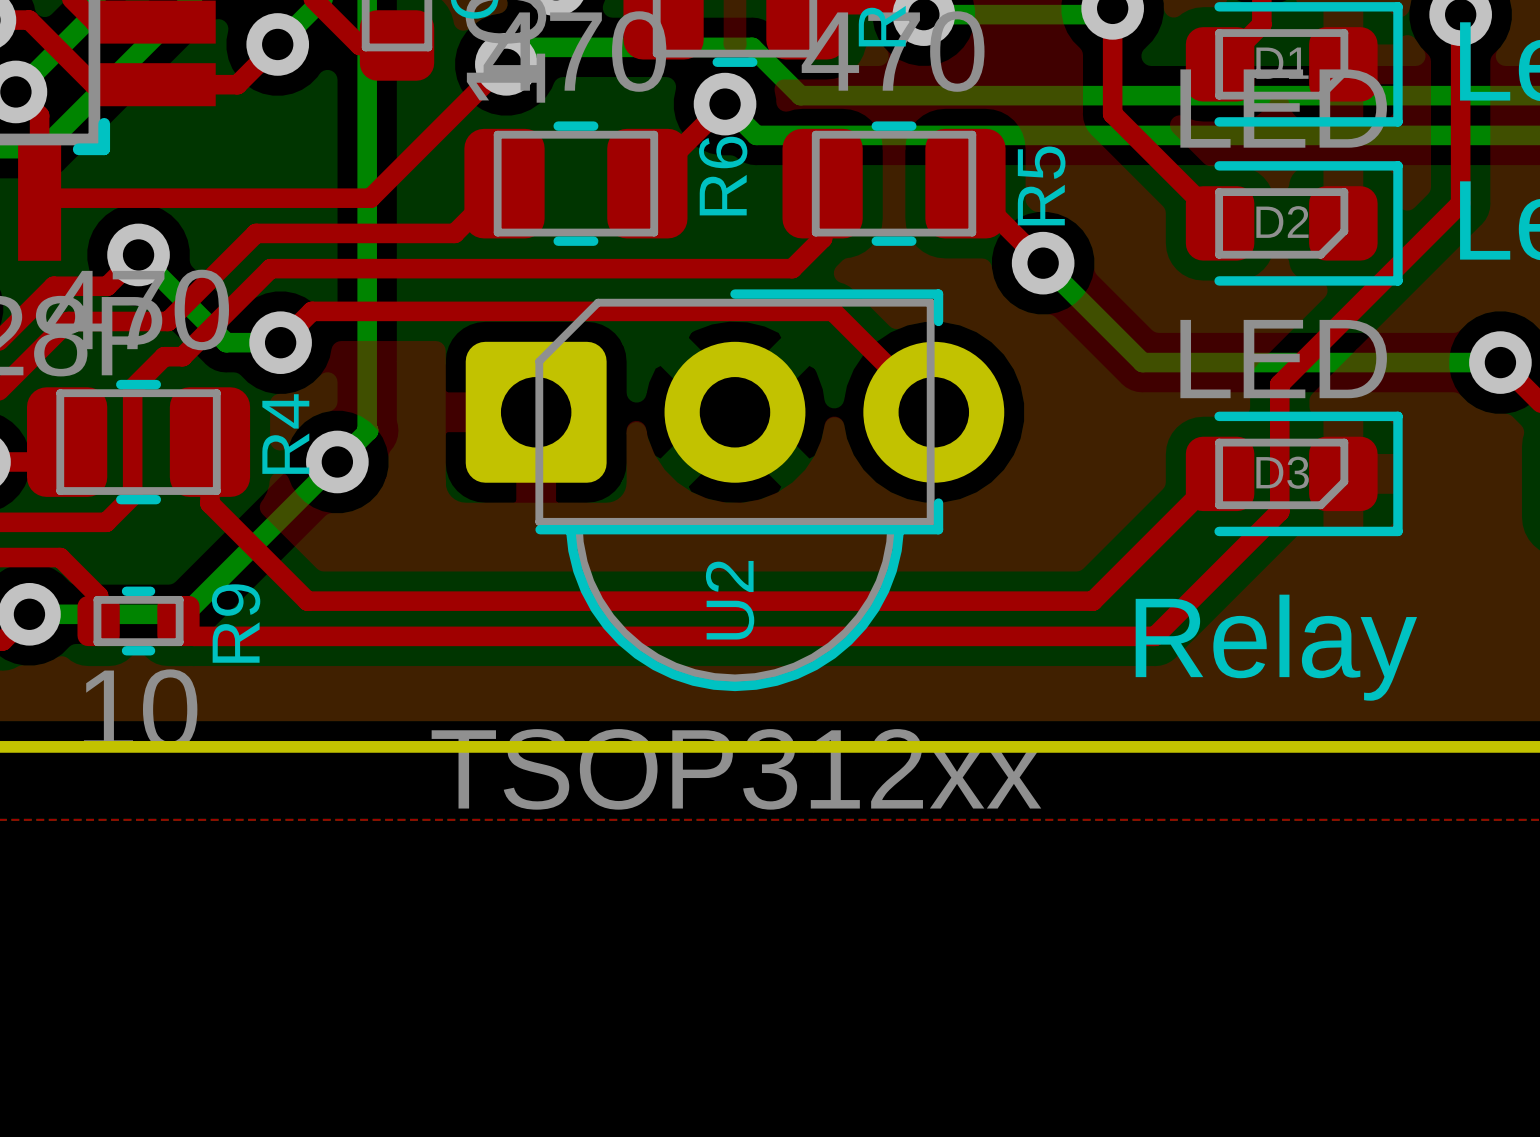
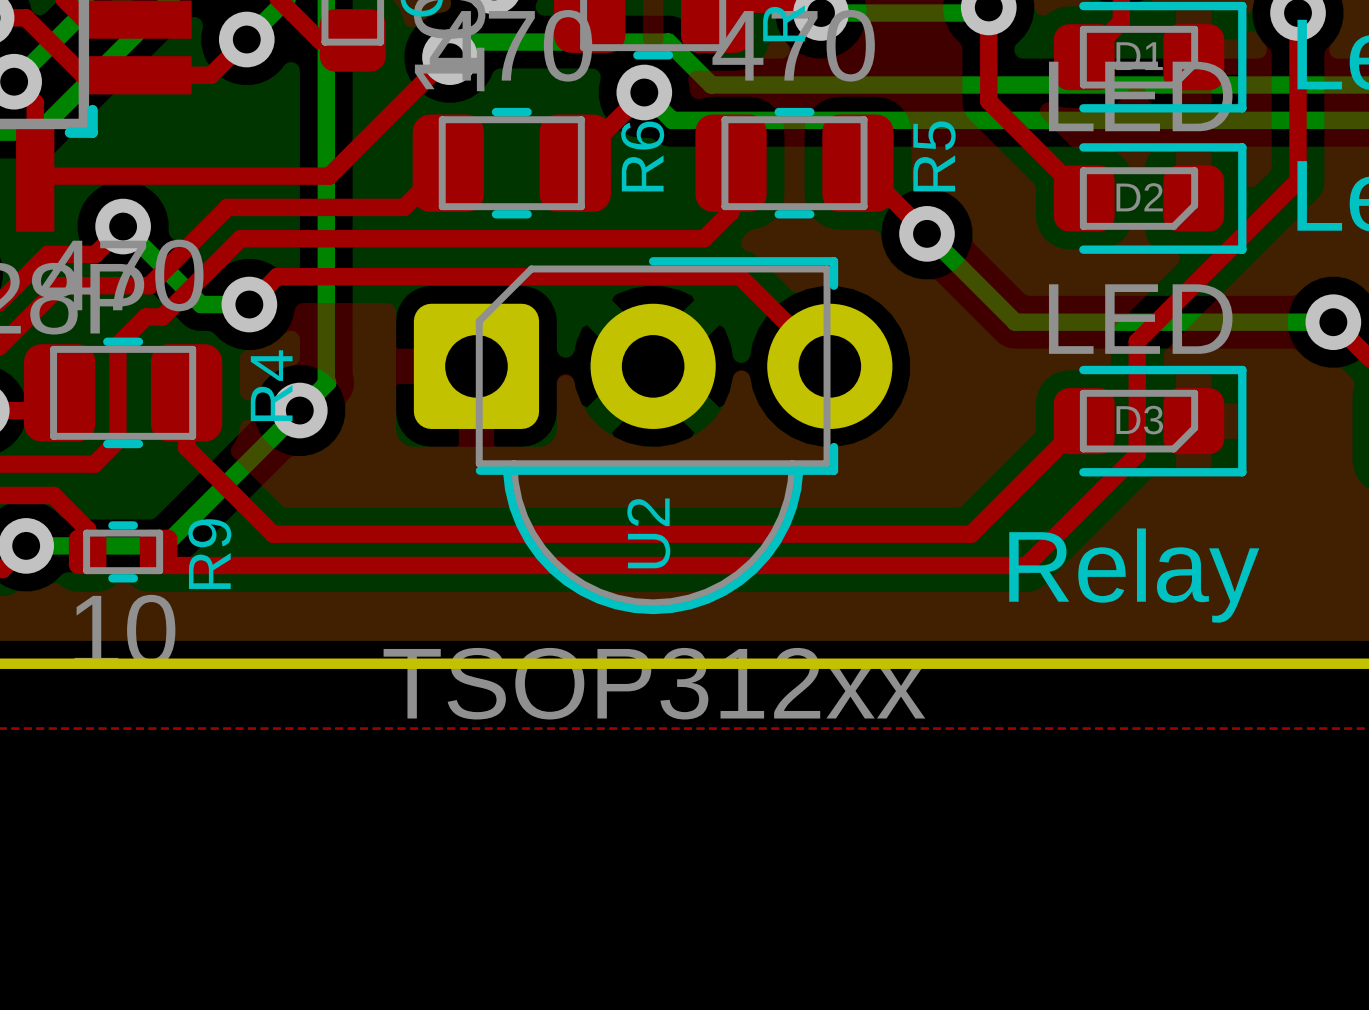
R5 name position: R5 (1041, 185) -> R5 (934, 156)
R4 name position: R4 (285, 434) -> R4 (271, 385)

